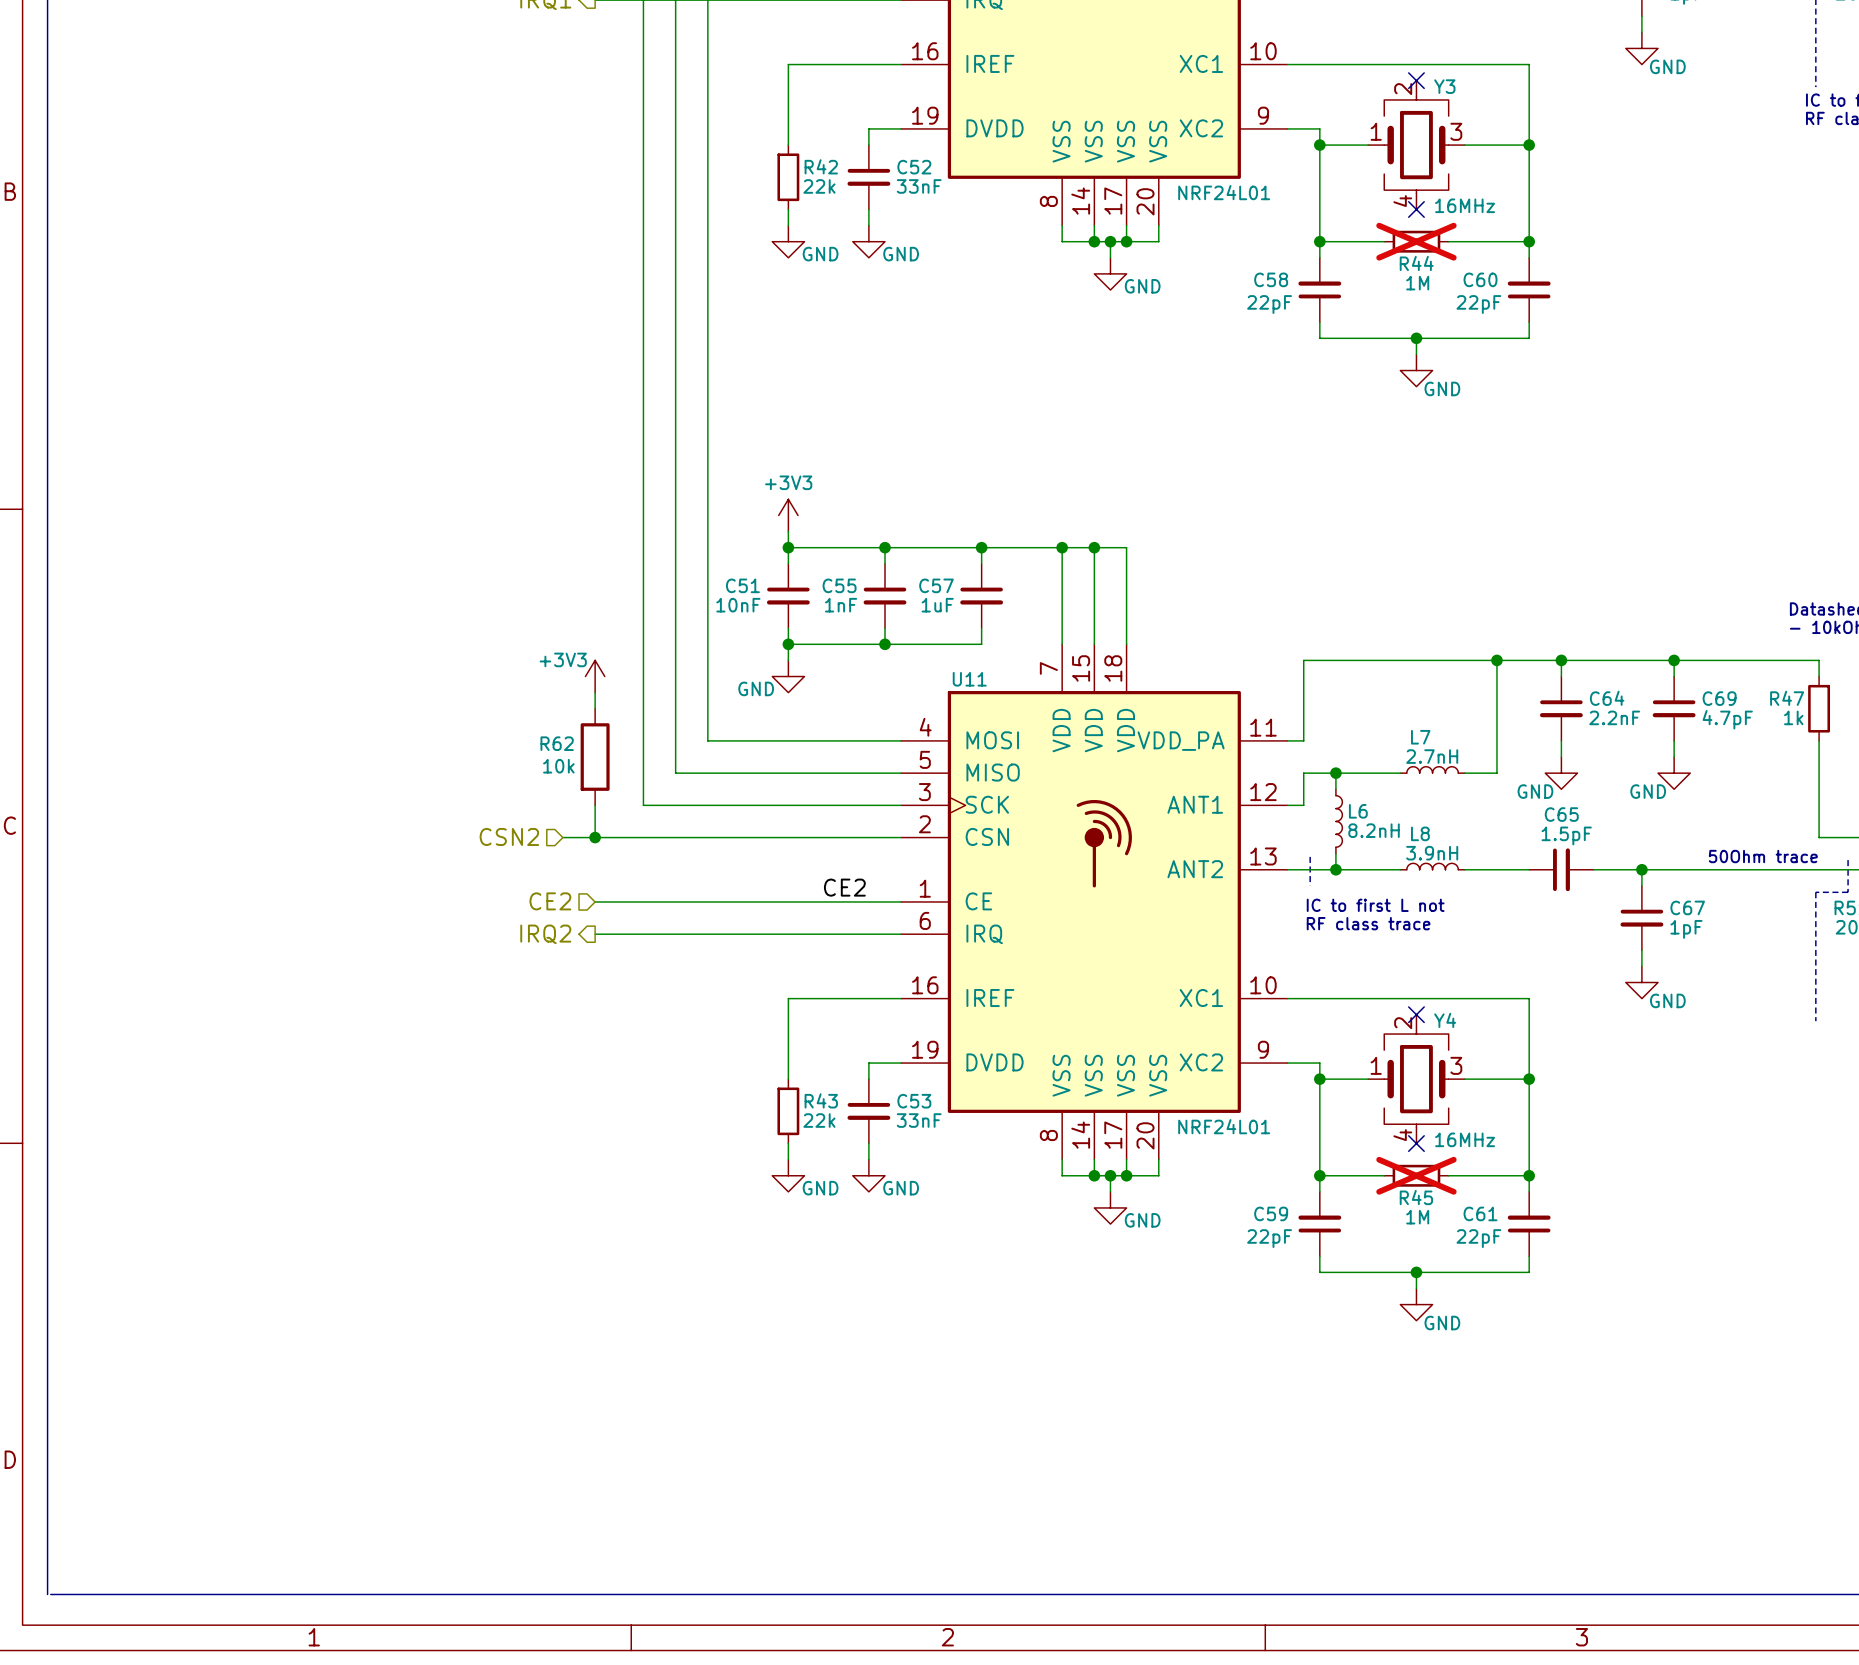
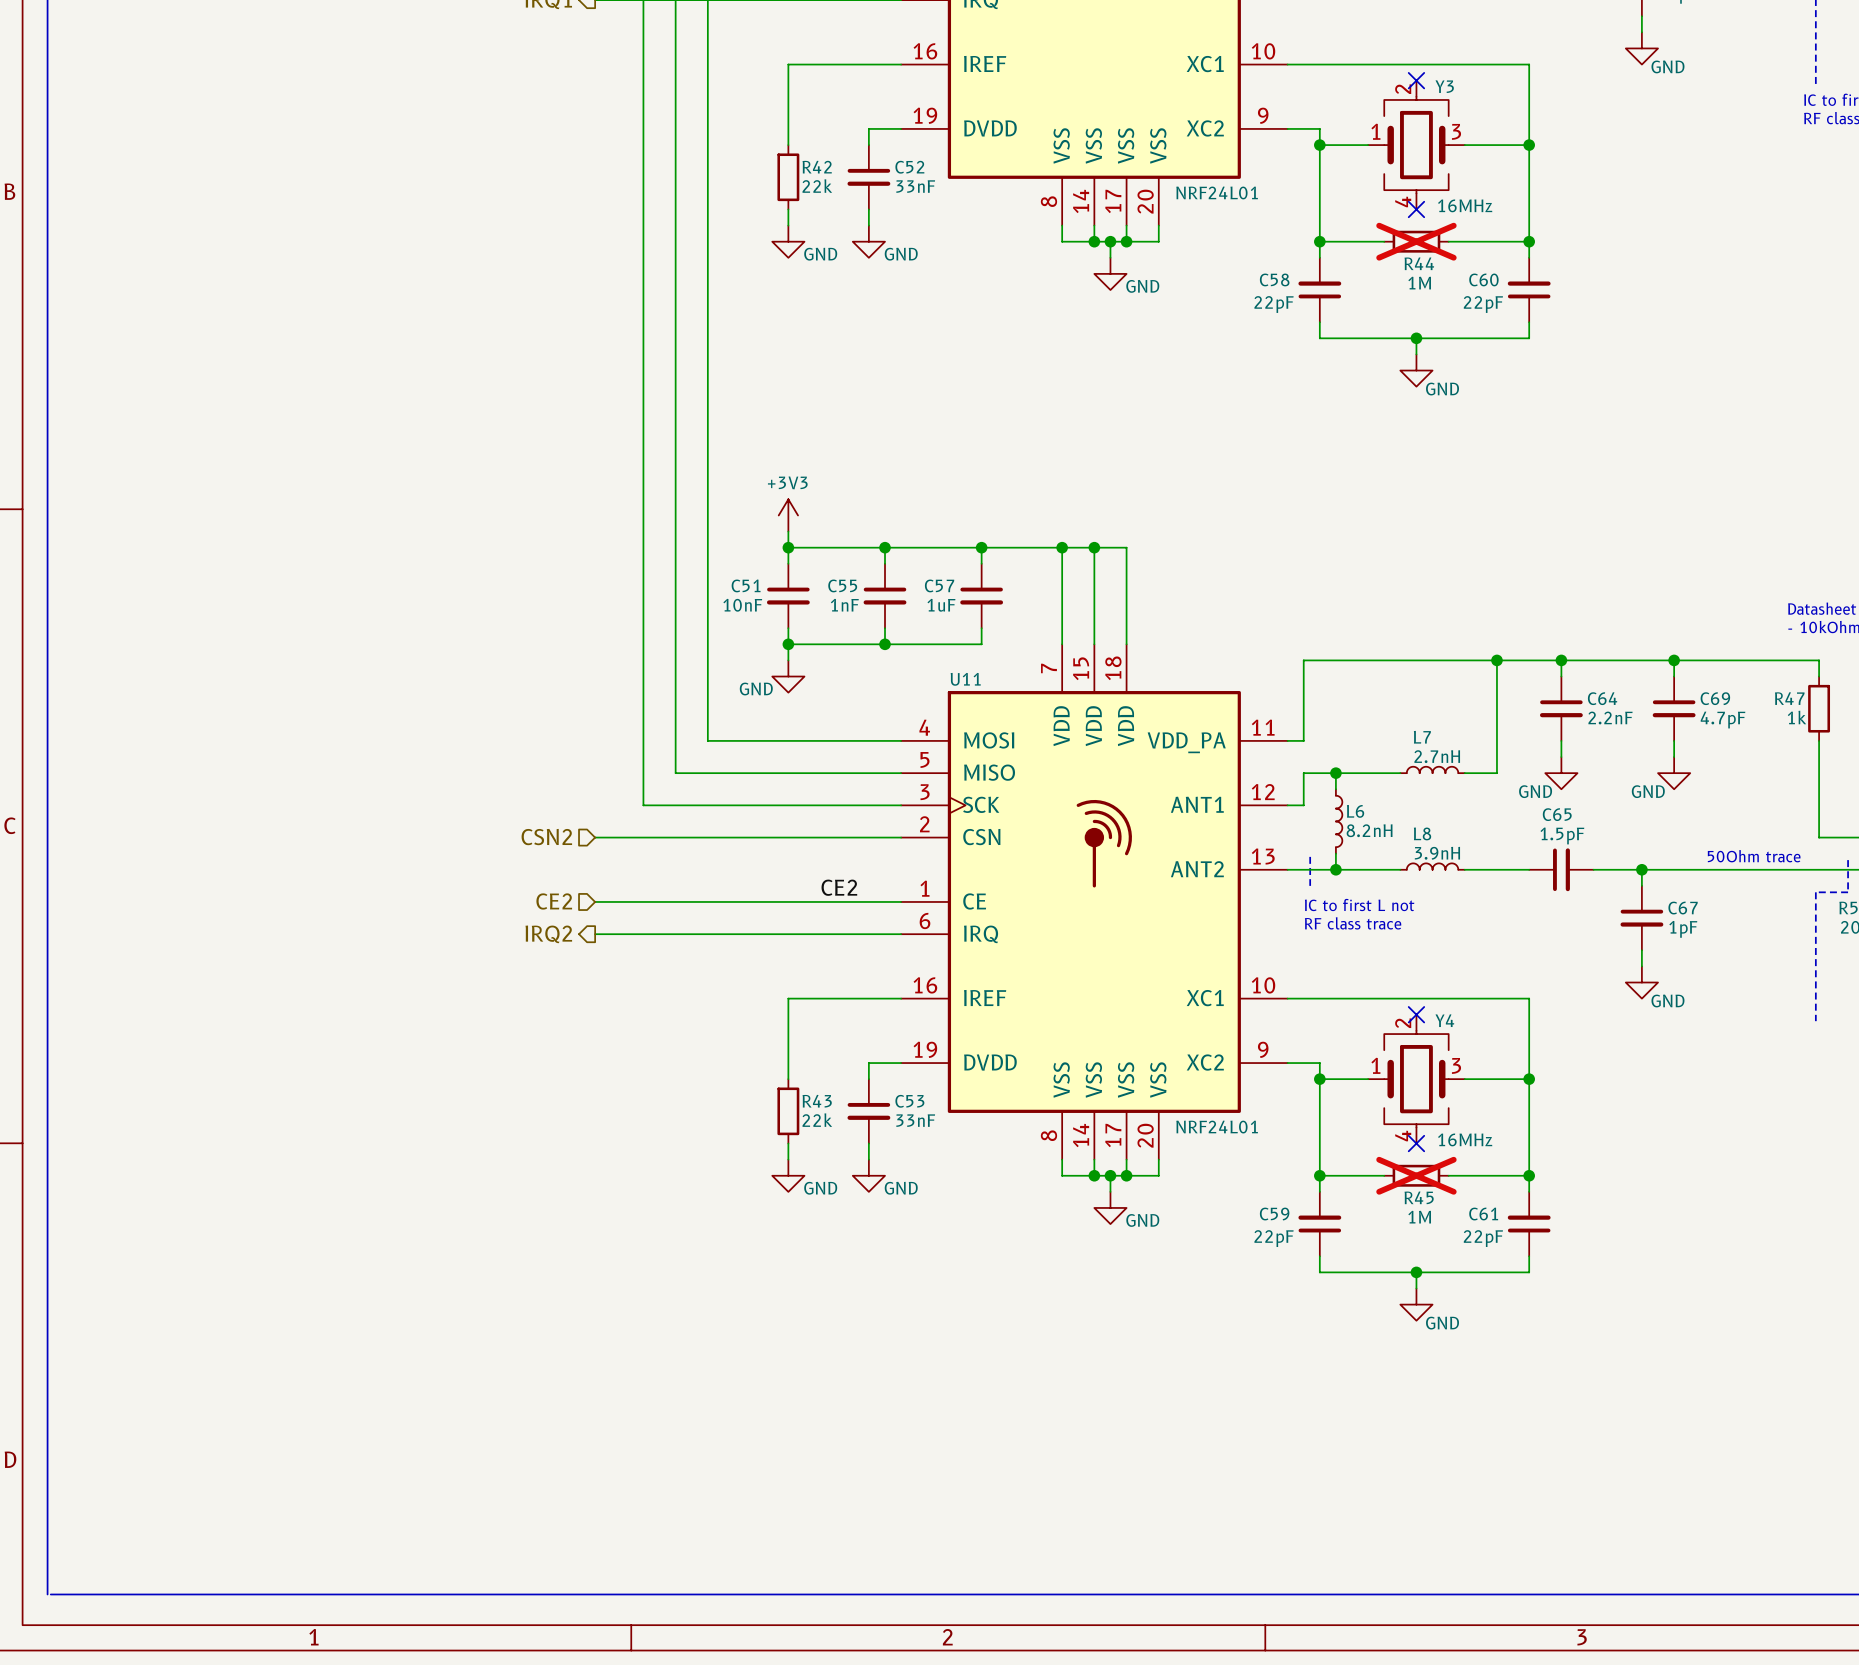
power symbol: +3V3 (595, 676) -> none
wire: (595, 692) (595, 708) -> none
R62: 10k (595, 757) -> none
wire: (595, 805) (595, 837) (562, 837) -> none
hierarchical label position: CSN2 (509, 836) -> CSN2 (546, 837)
junction: (595, 837) -> none

